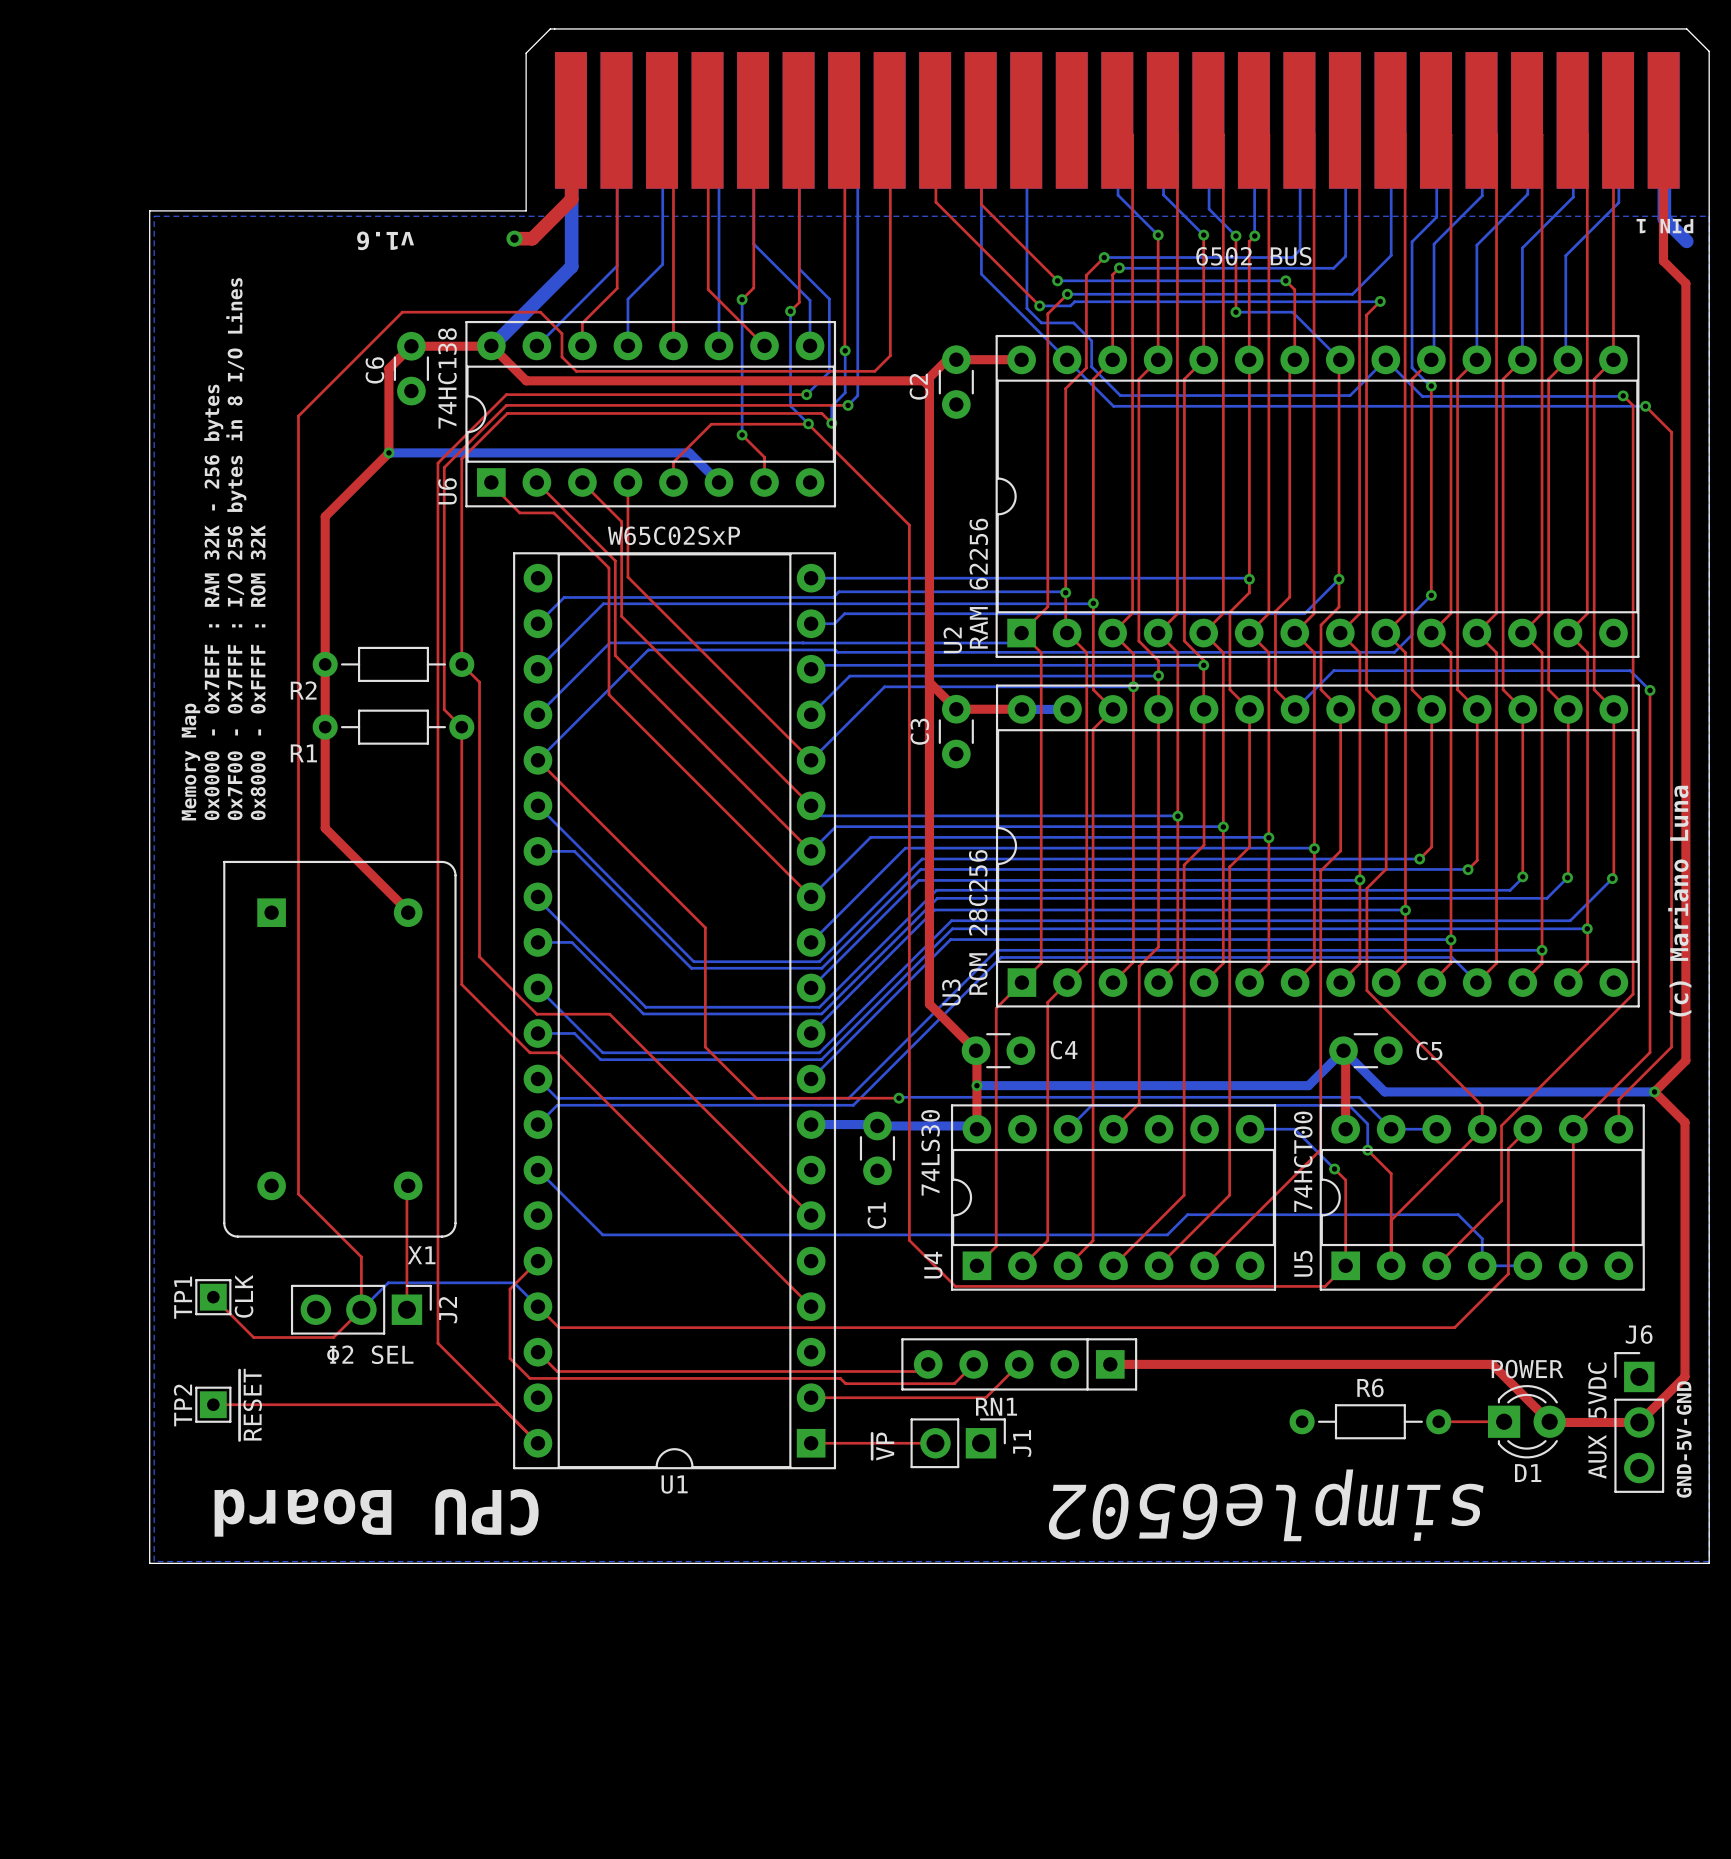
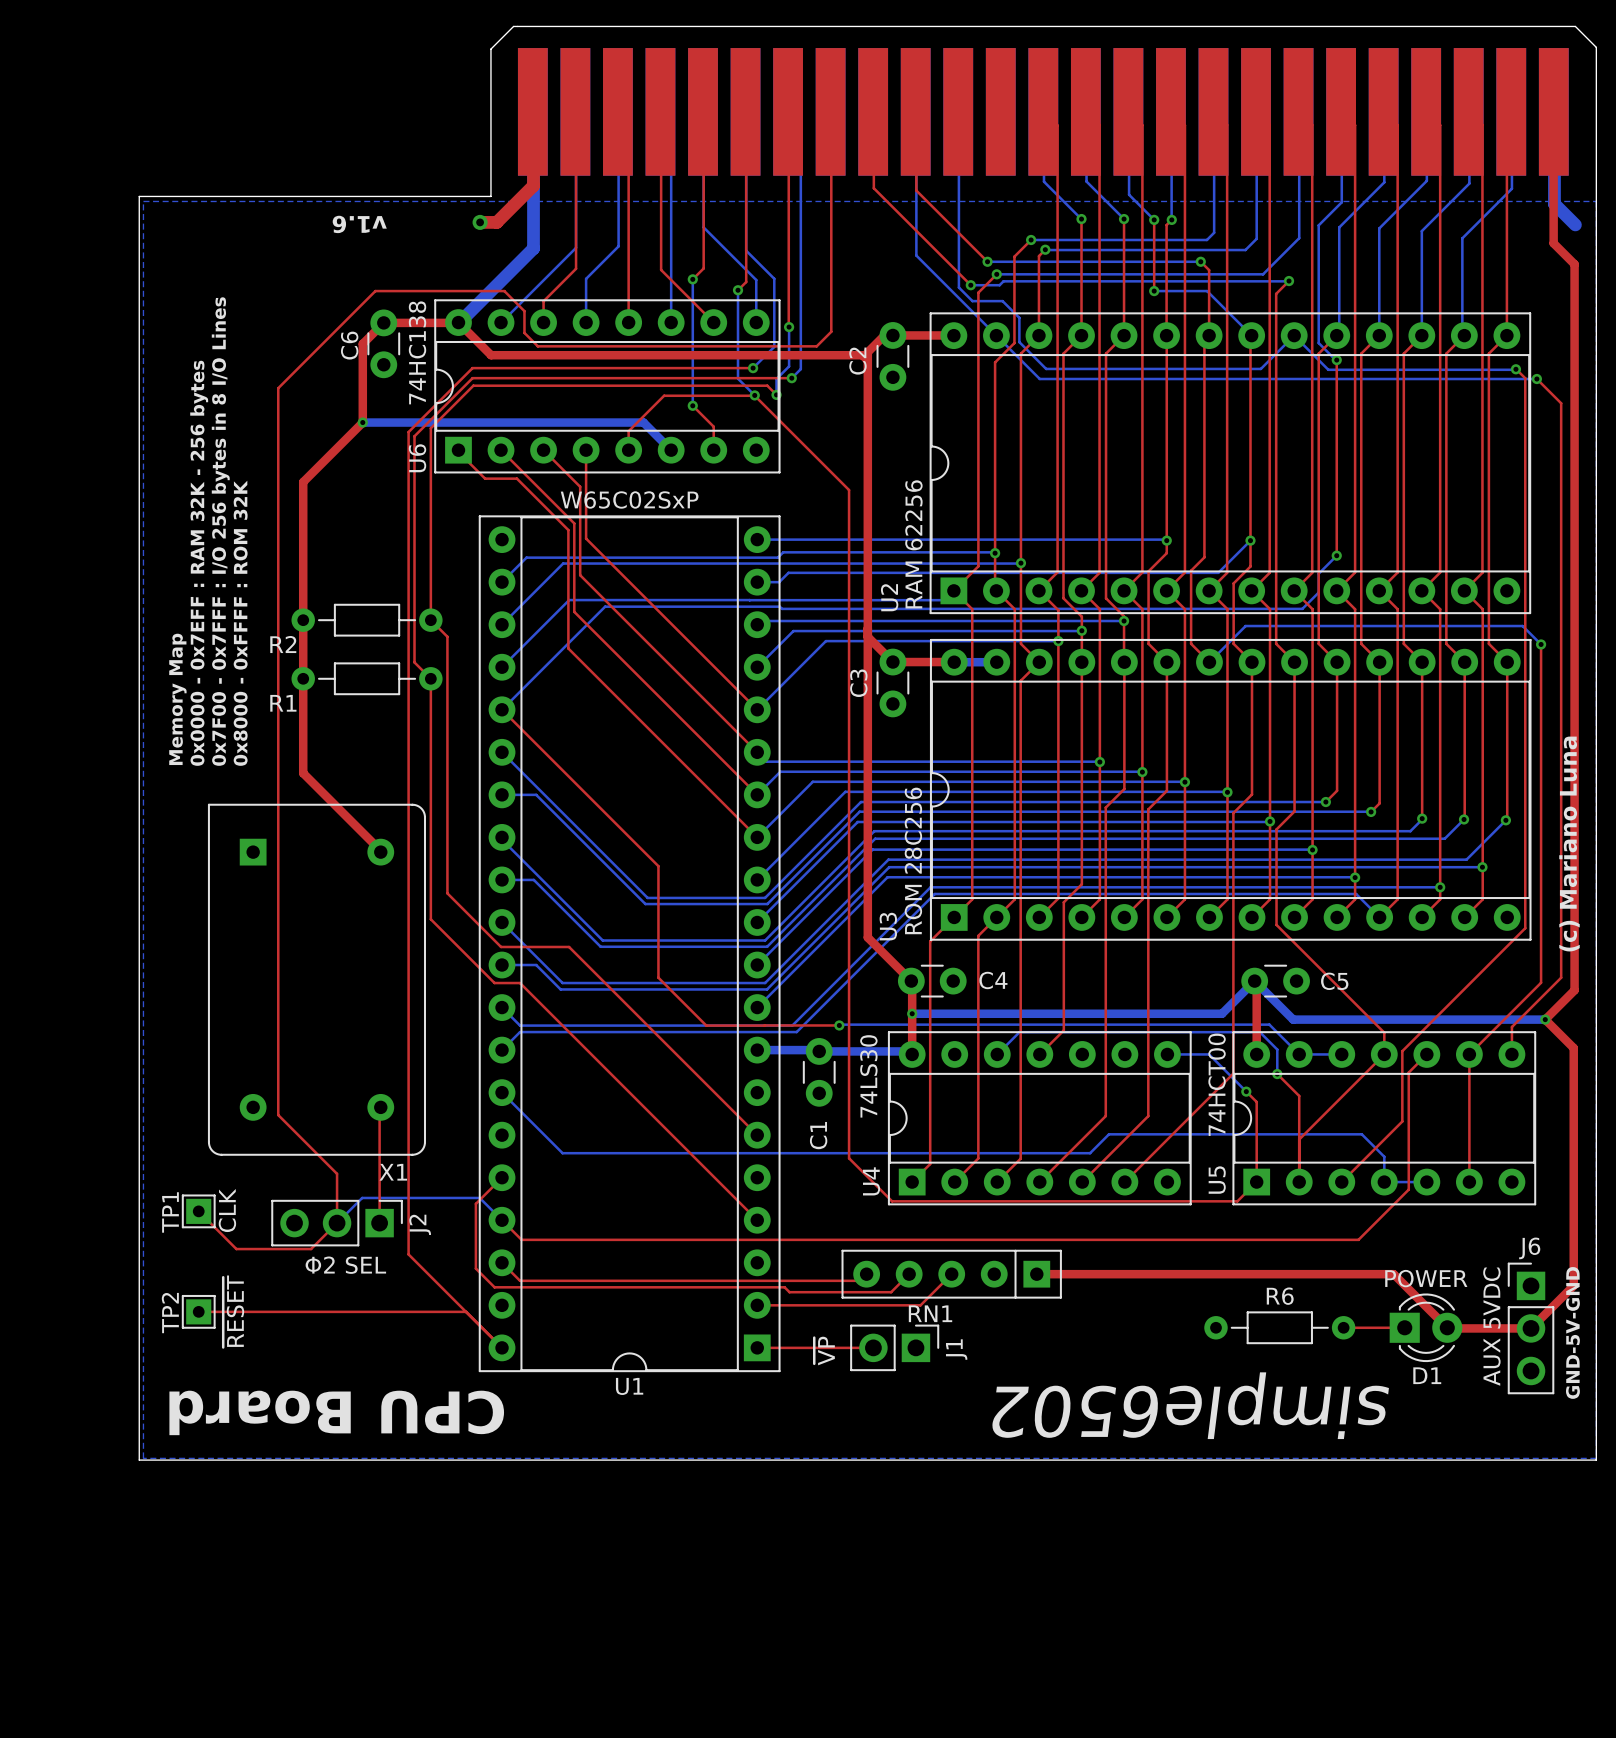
text: PIN 1 (1664, 226) -> none
part value: 6502 BUS (1253, 256) -> none

